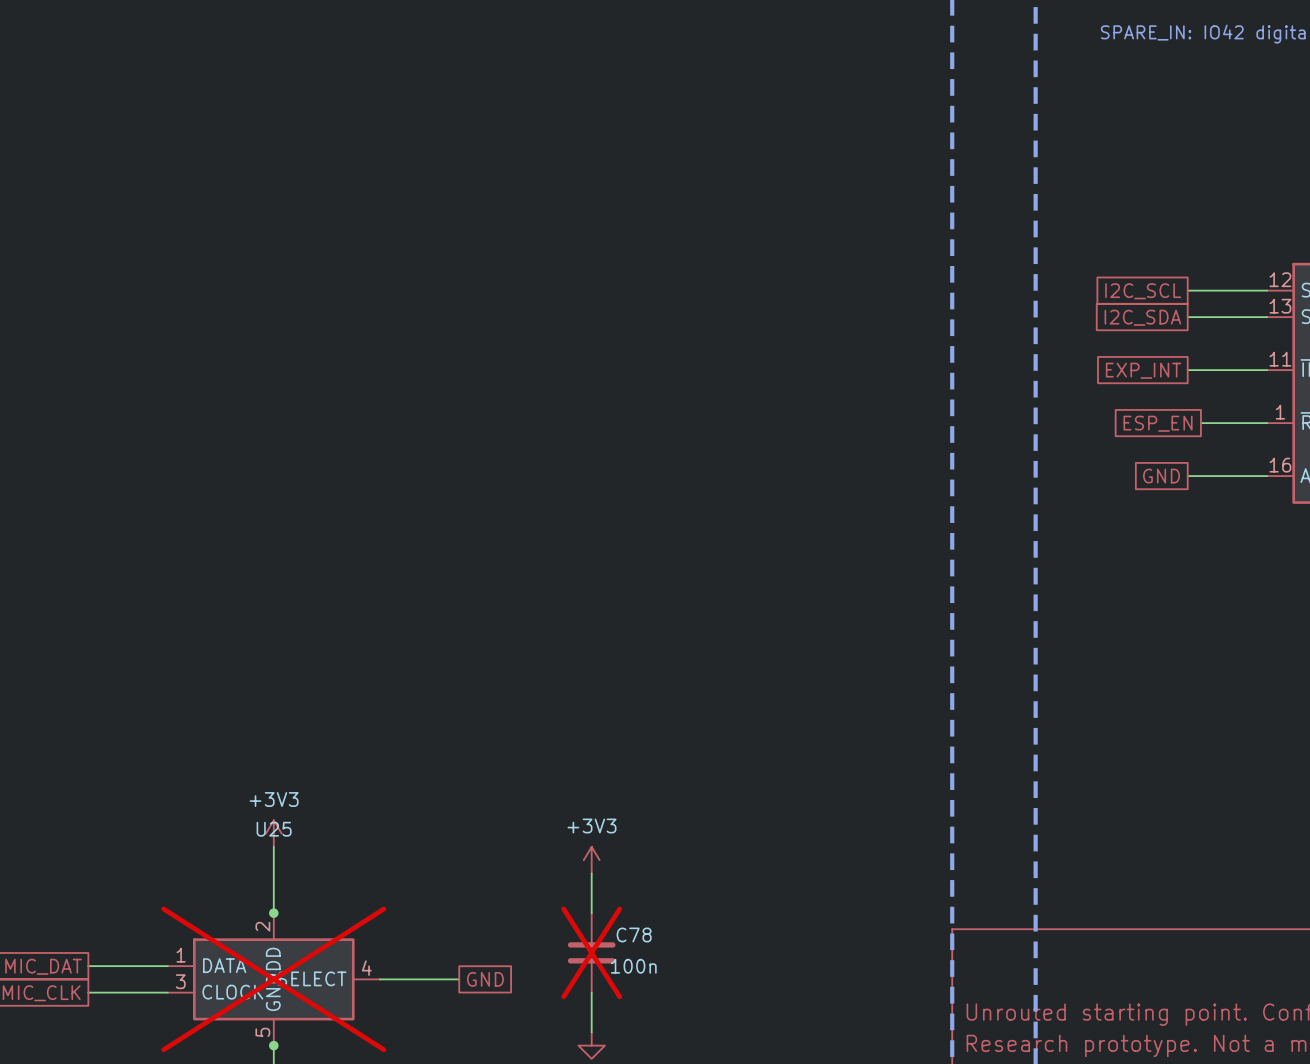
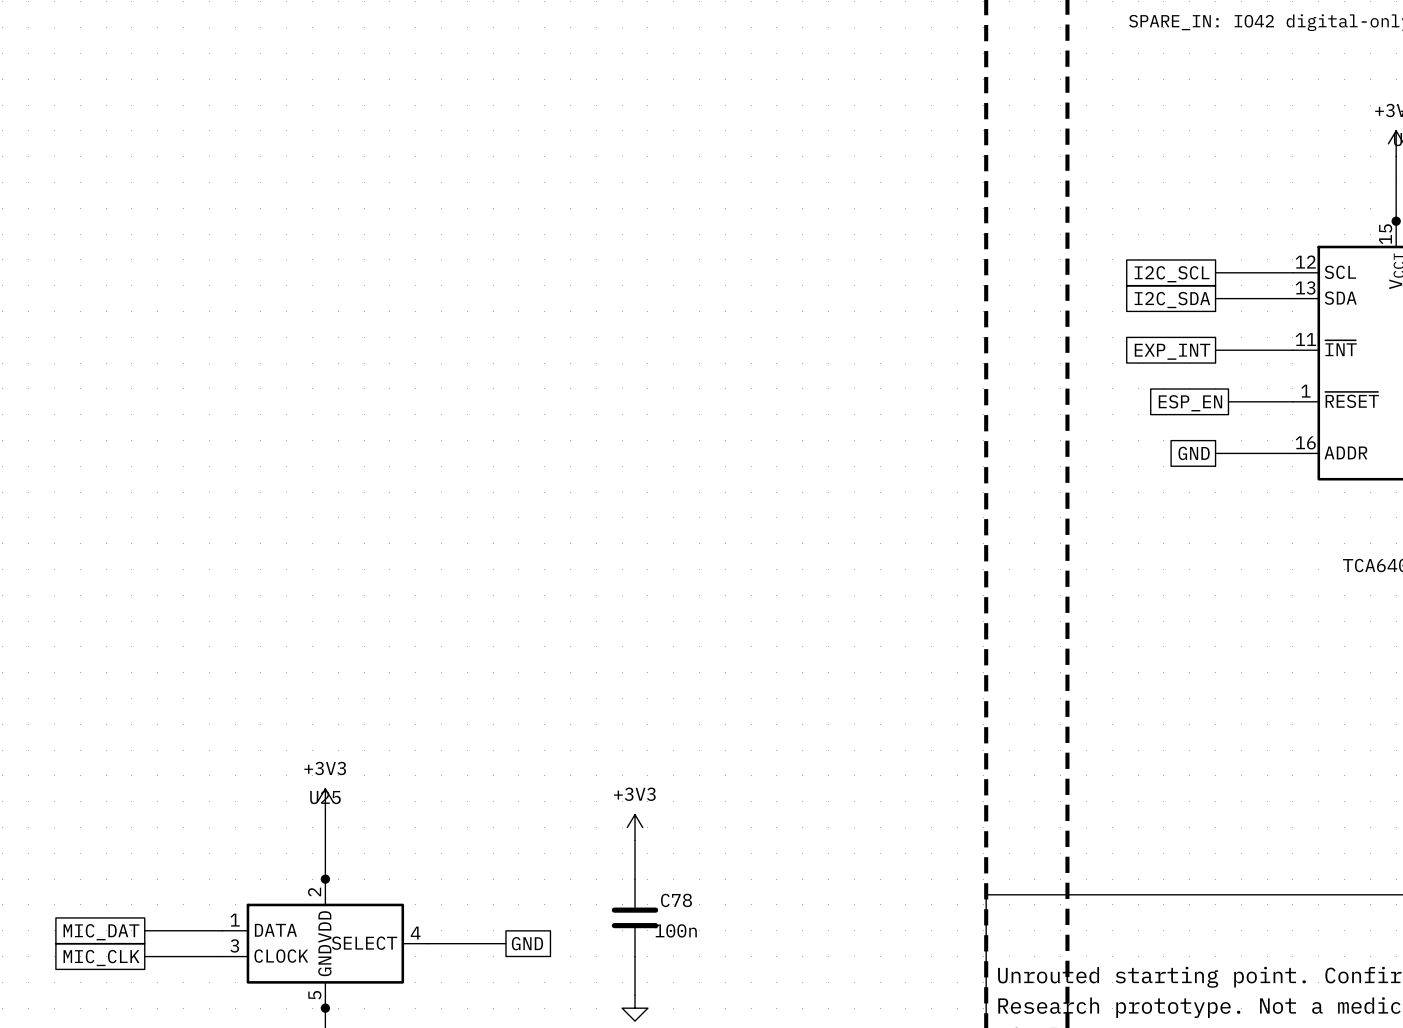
C78 do-not-place cross: (591, 952) -> none
U25 do-not-place cross: (273, 979) -> none

